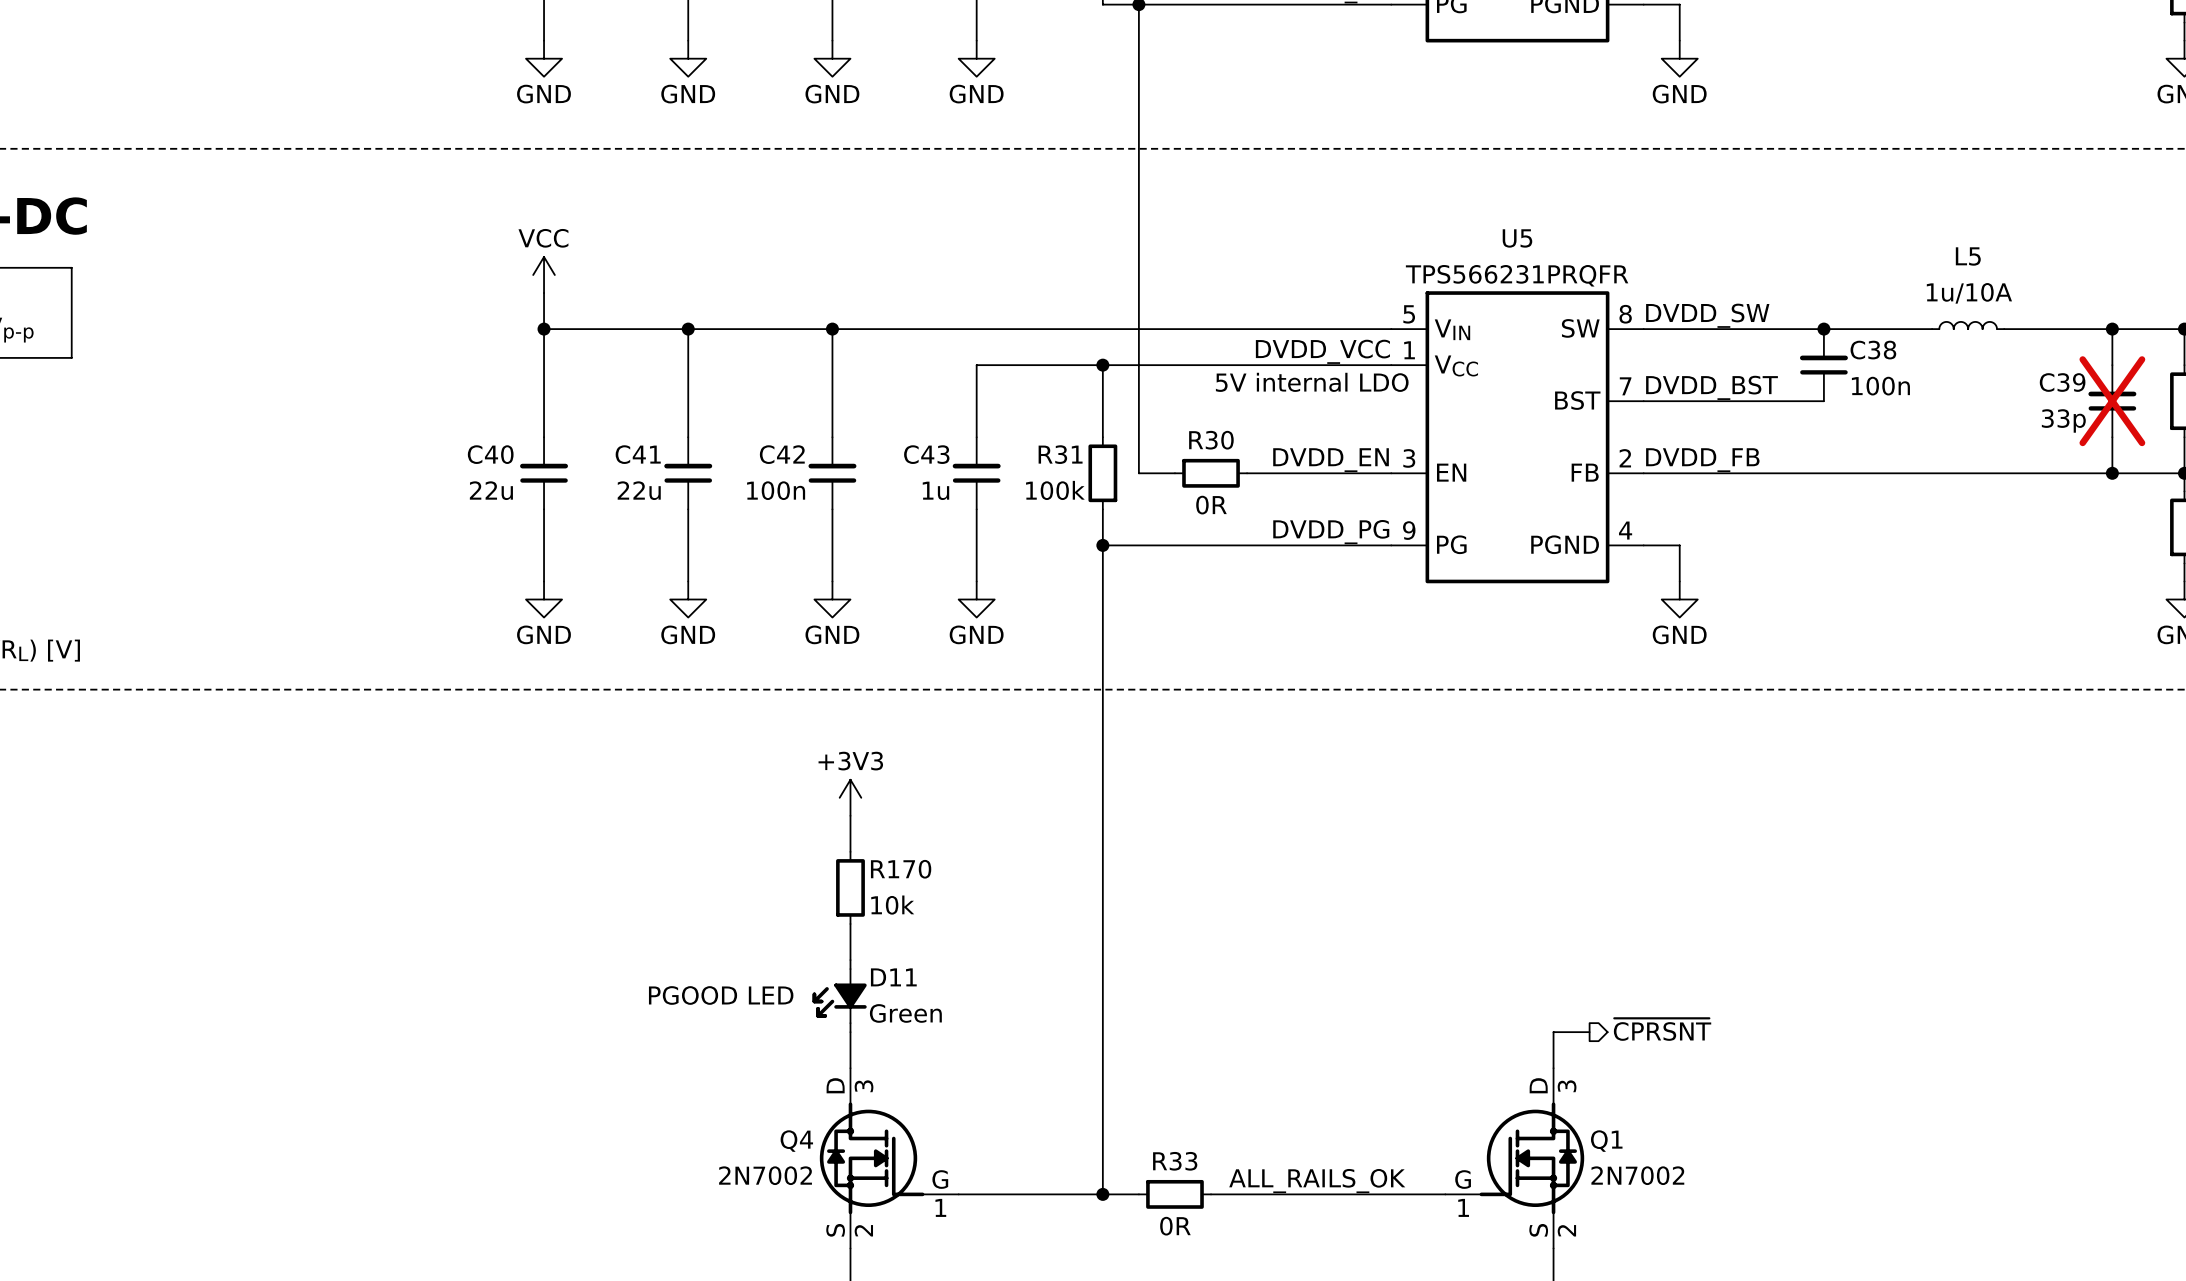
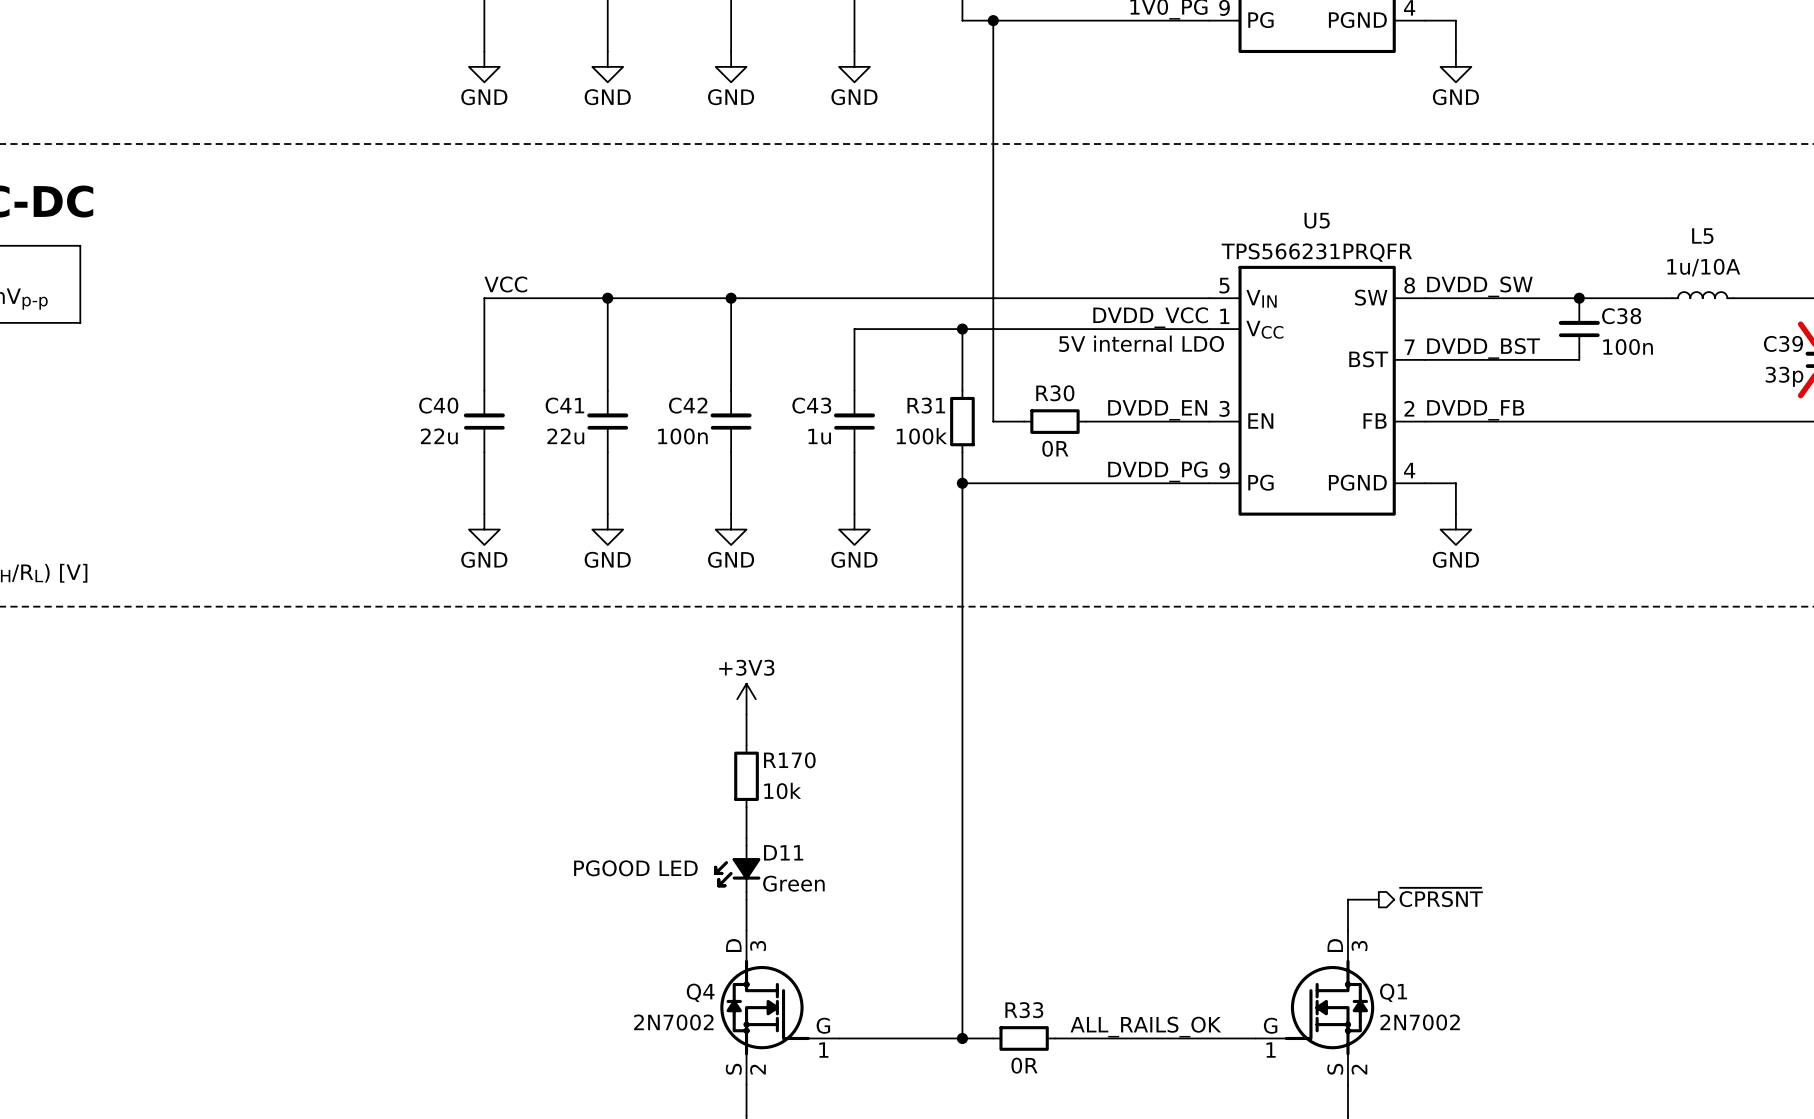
power symbol: VCC (544, 275) -> none
wire: (544, 293) (544, 329) -> none
label: none -> VCC (505, 284)
junction: (544, 329) -> none

